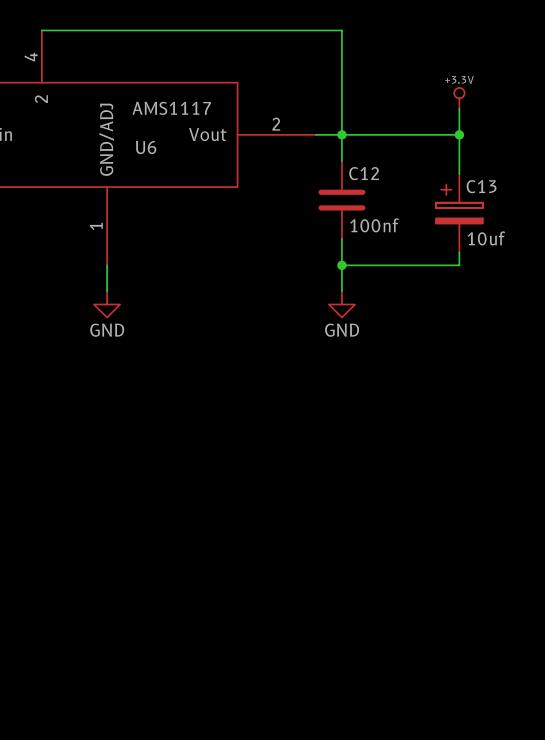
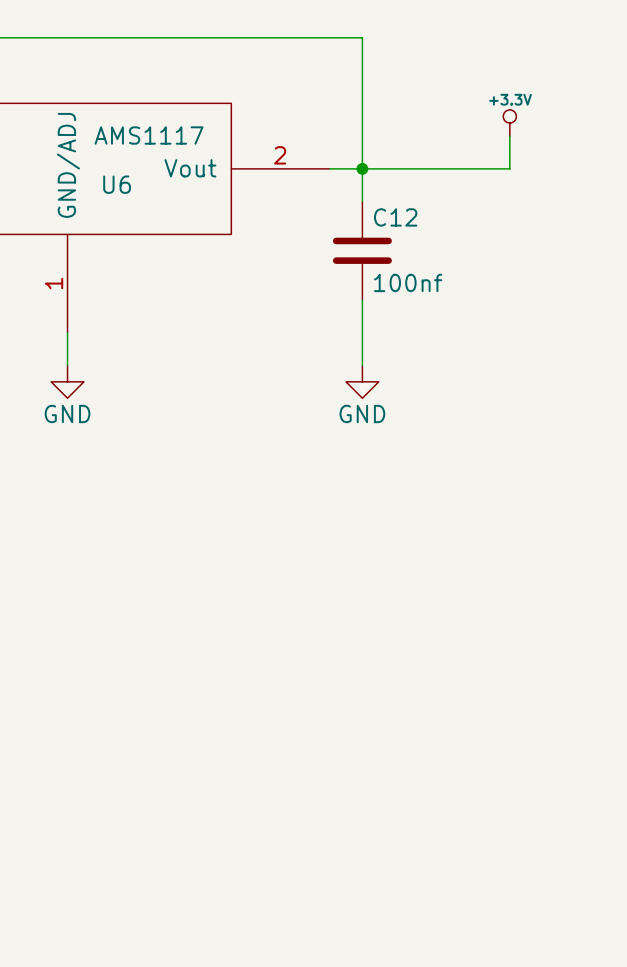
wire: (459, 134) (459, 174) -> none
junction: (459, 134) -> none
C13: 10uf (459, 213) -> none
wire: (459, 252) (459, 265) (341, 265) -> none
junction: (341, 265) -> none

